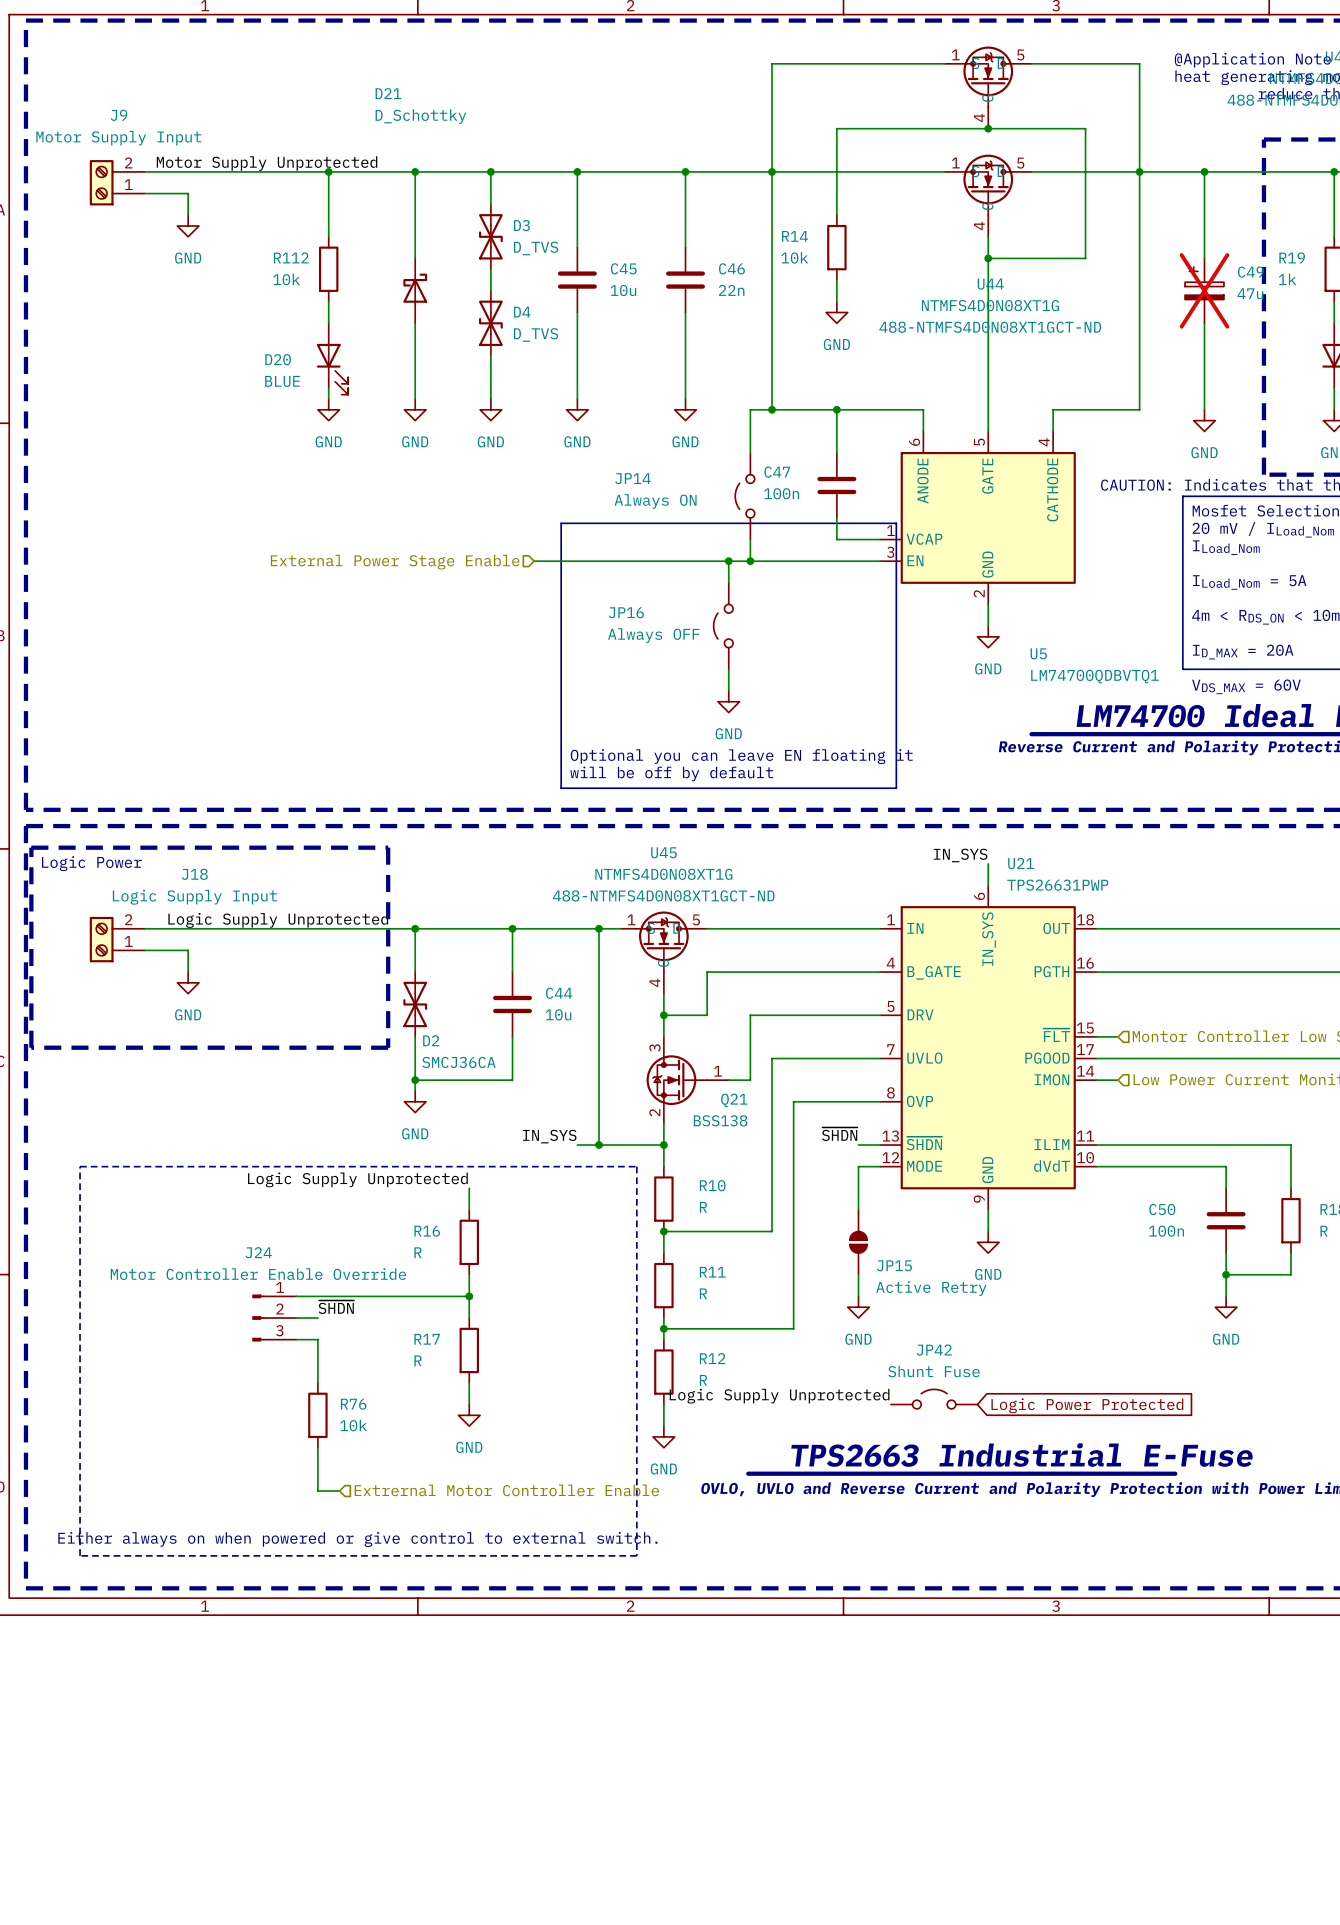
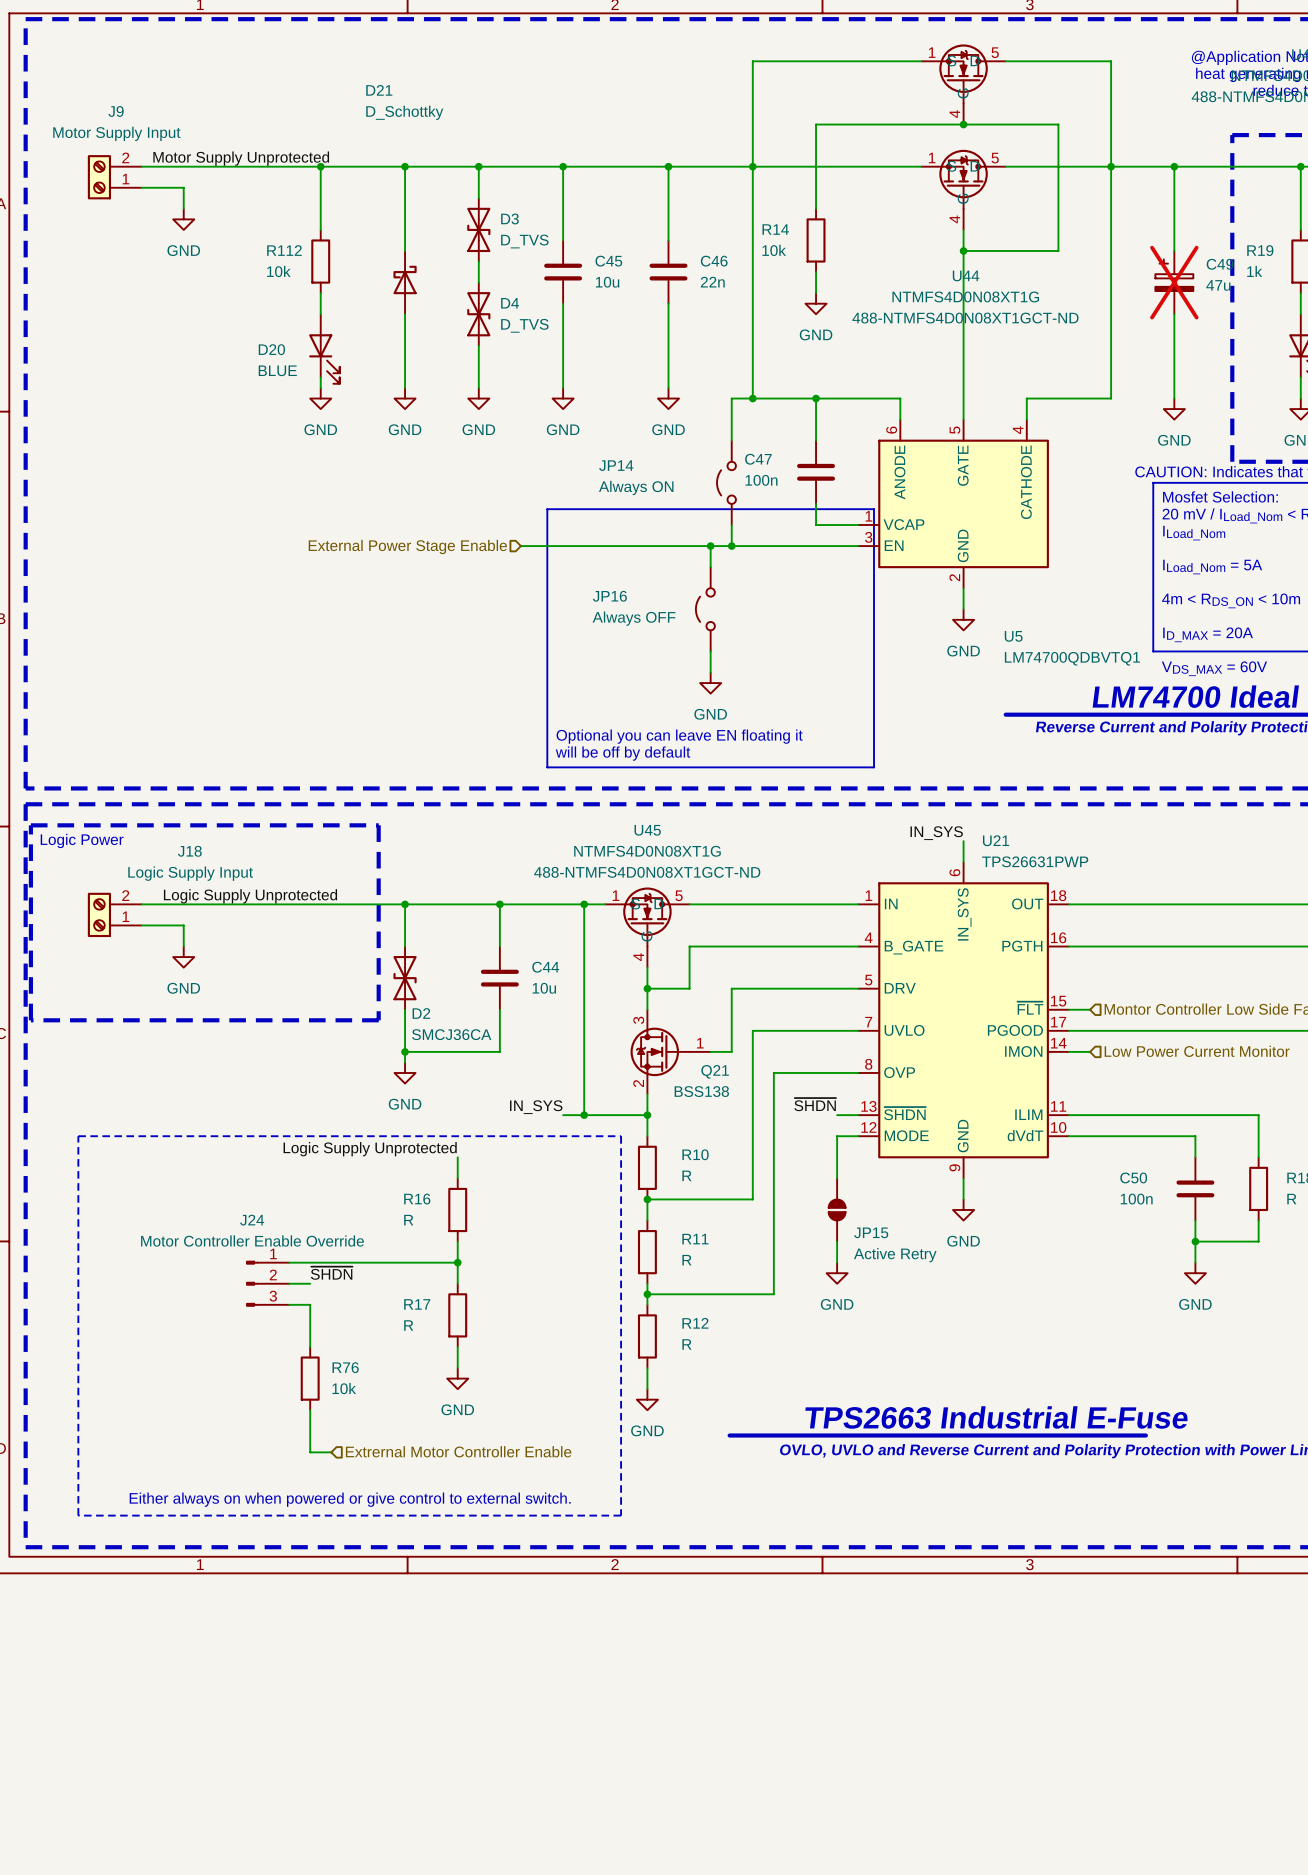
label: Logic Supply Unprotected (779, 1396) -> none
JP42: Shunt Fuse (934, 1399) -> none
global label: Logic Power Protected (1087, 1405) -> none

